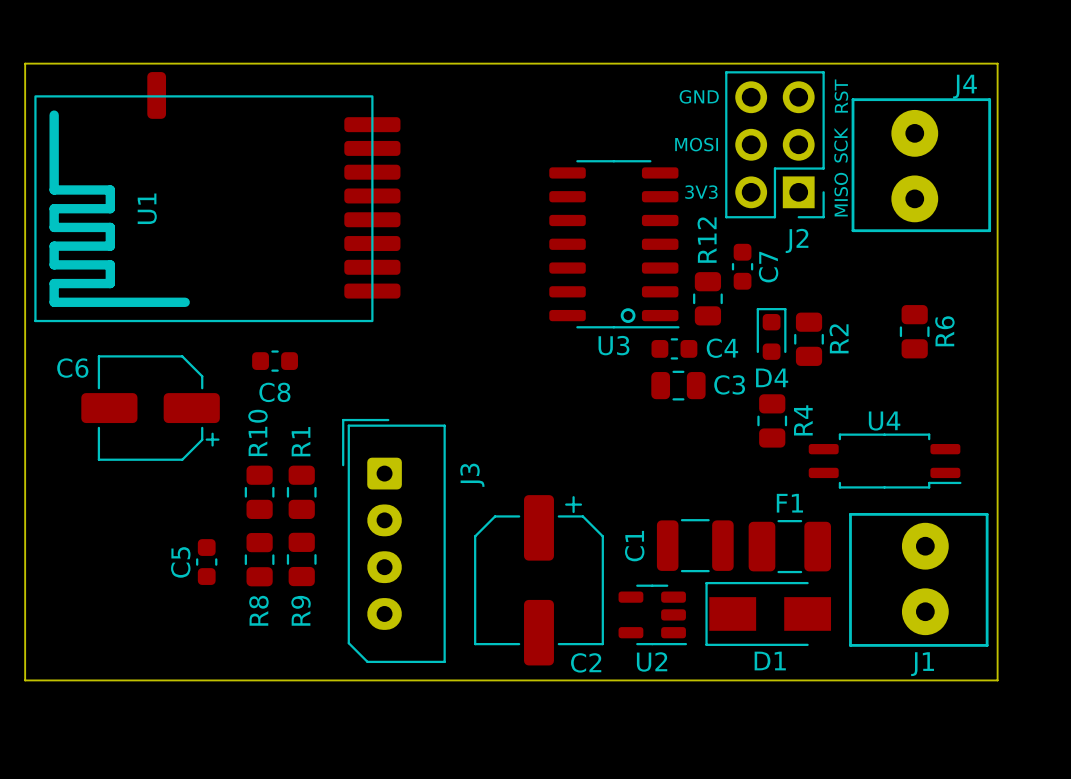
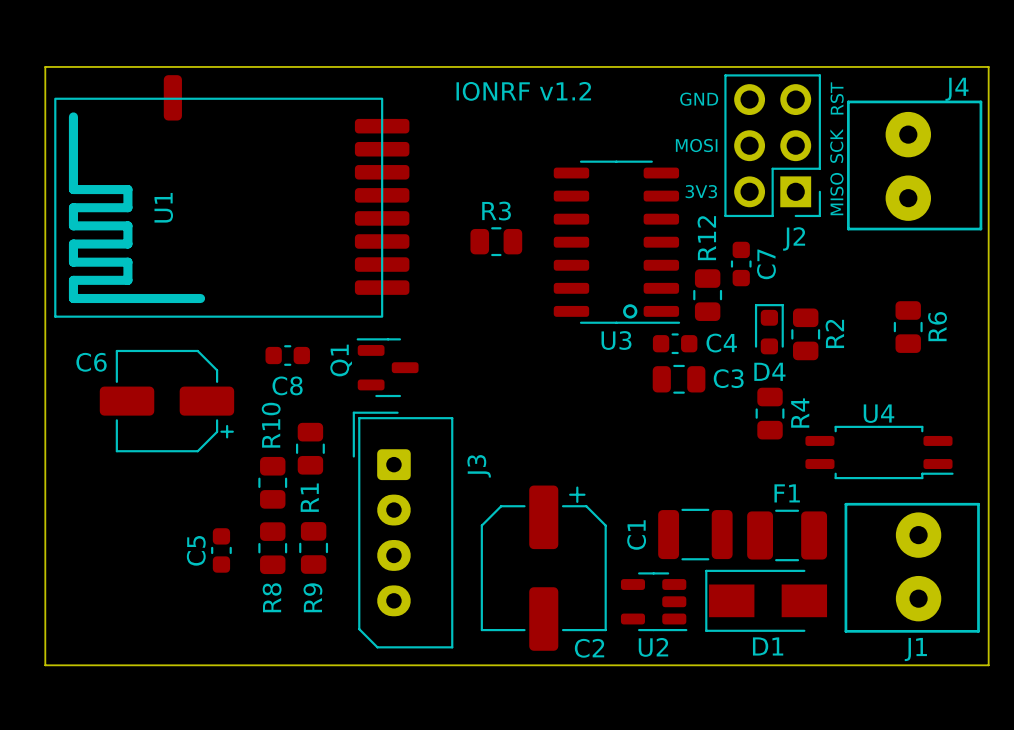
text: none -> IONRF v1.2 (523, 91)
R3: none -> (496, 241)
Q1: none -> (387, 367)
R1 name position: R1 (301, 441) -> R1 (309, 497)
R1 position: (301, 492) -> (310, 448)

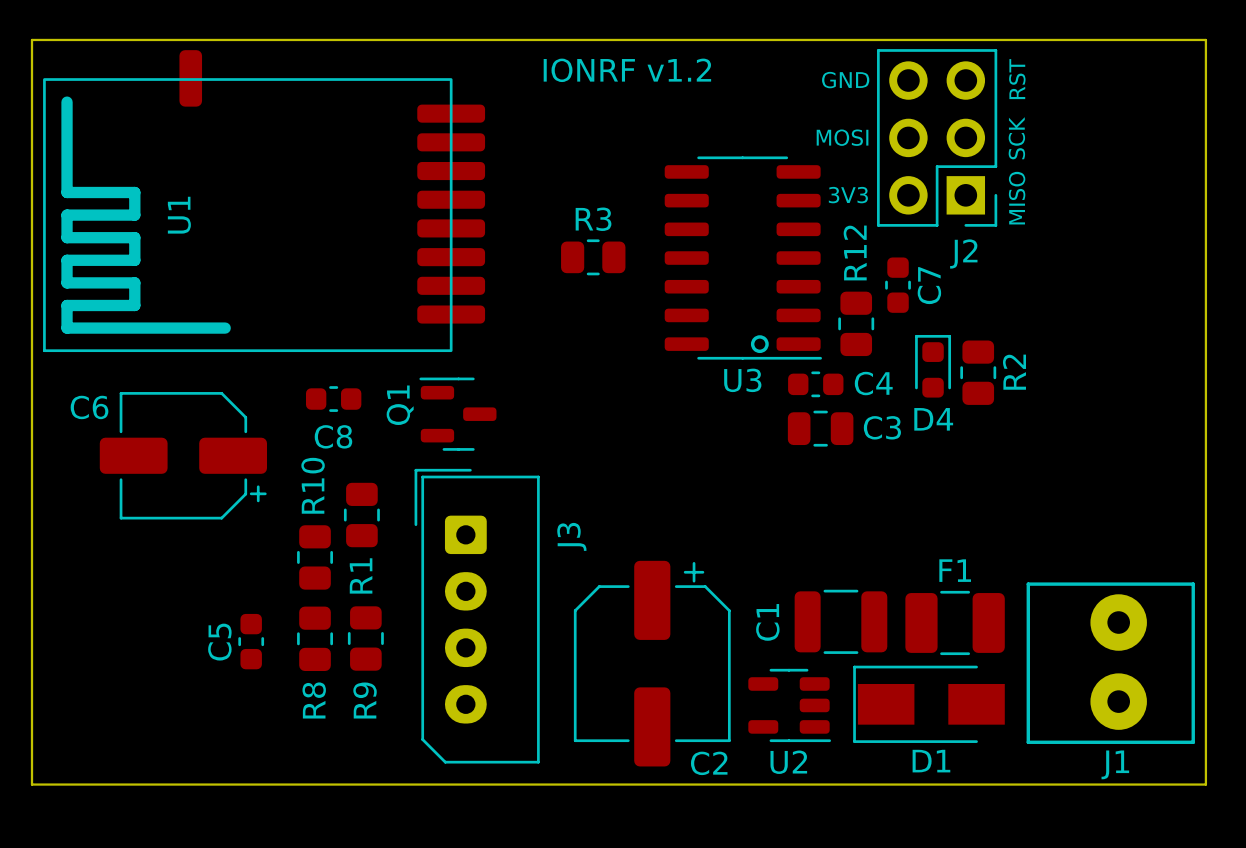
J4: (914, 165) -> none
R6: (908, 327) -> none
R4: (770, 413) -> none
U4: (879, 452) -> none

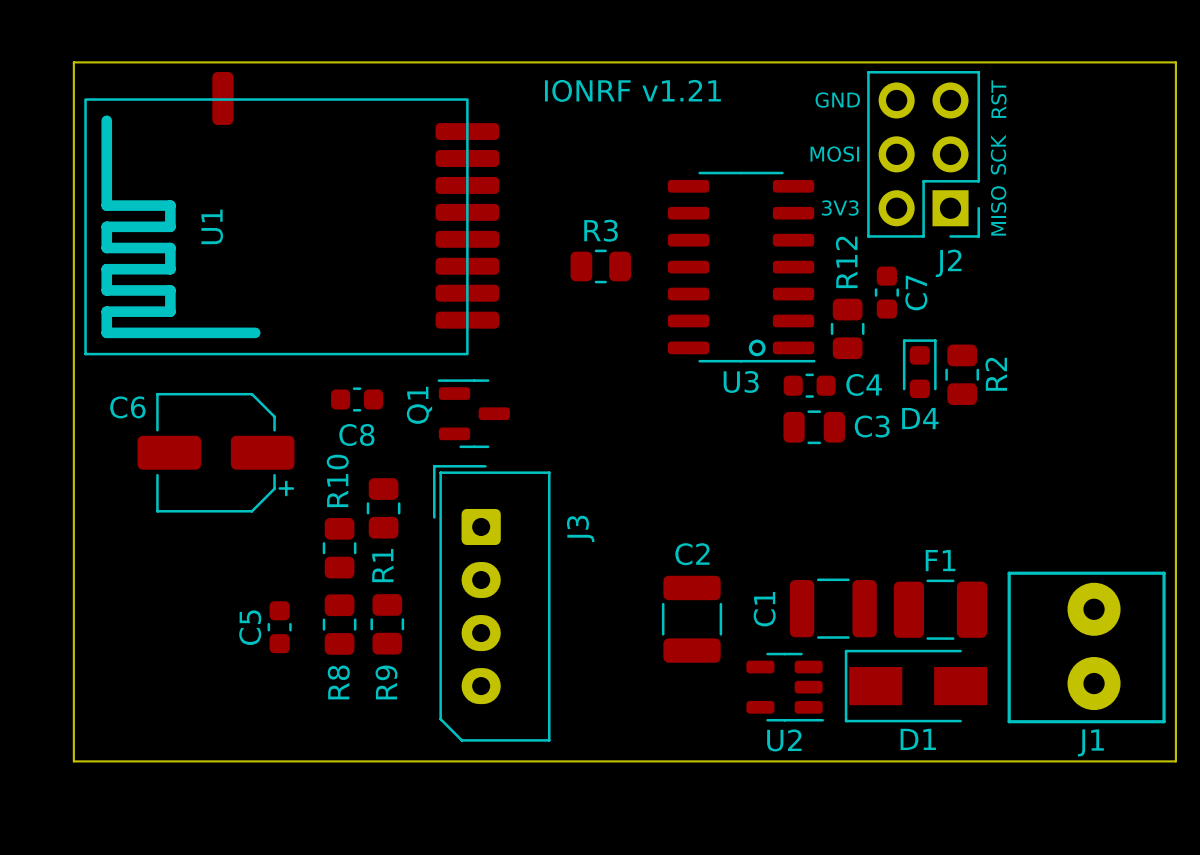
text: IONRF v1.2 (627, 70) -> IONRF v1.21 (632, 90)
C2 footprint: [573, 560, 731, 767] -> [661, 575, 723, 663]
C2 name position: C2 (709, 763) -> C2 (692, 554)

